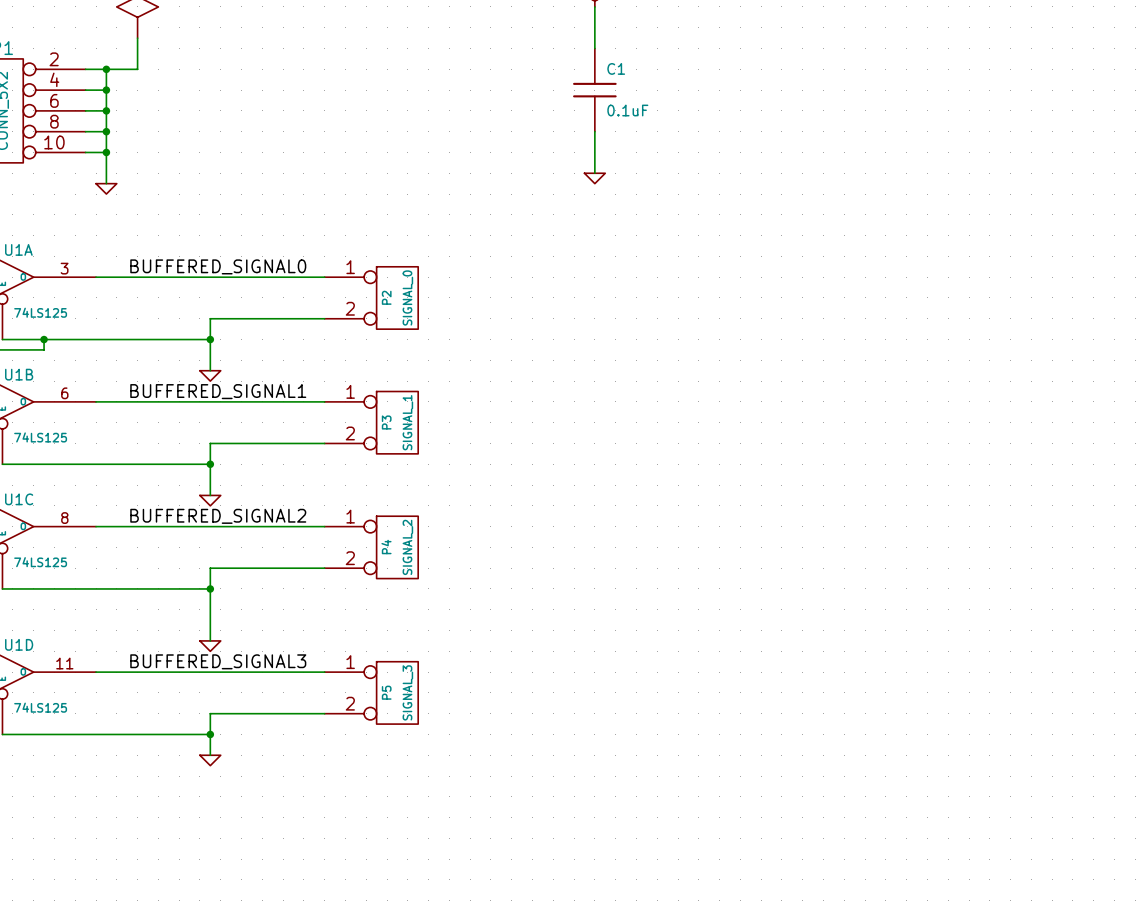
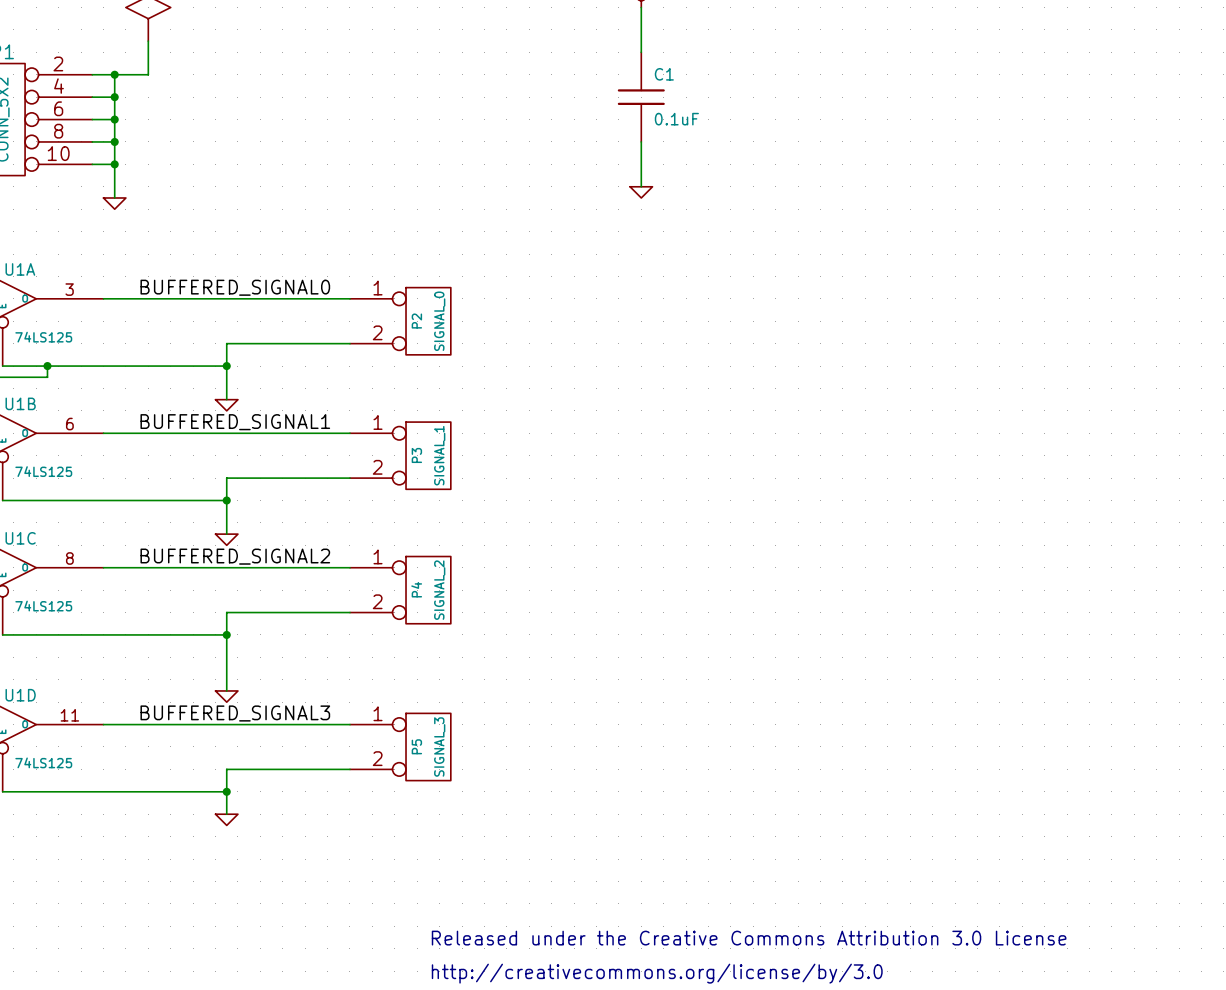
text: none -> Released under the Creative Commons Attribution 3.0 License (749, 938)
text: none -> http://creativecommons.org/license/by/3.0 (657, 973)

